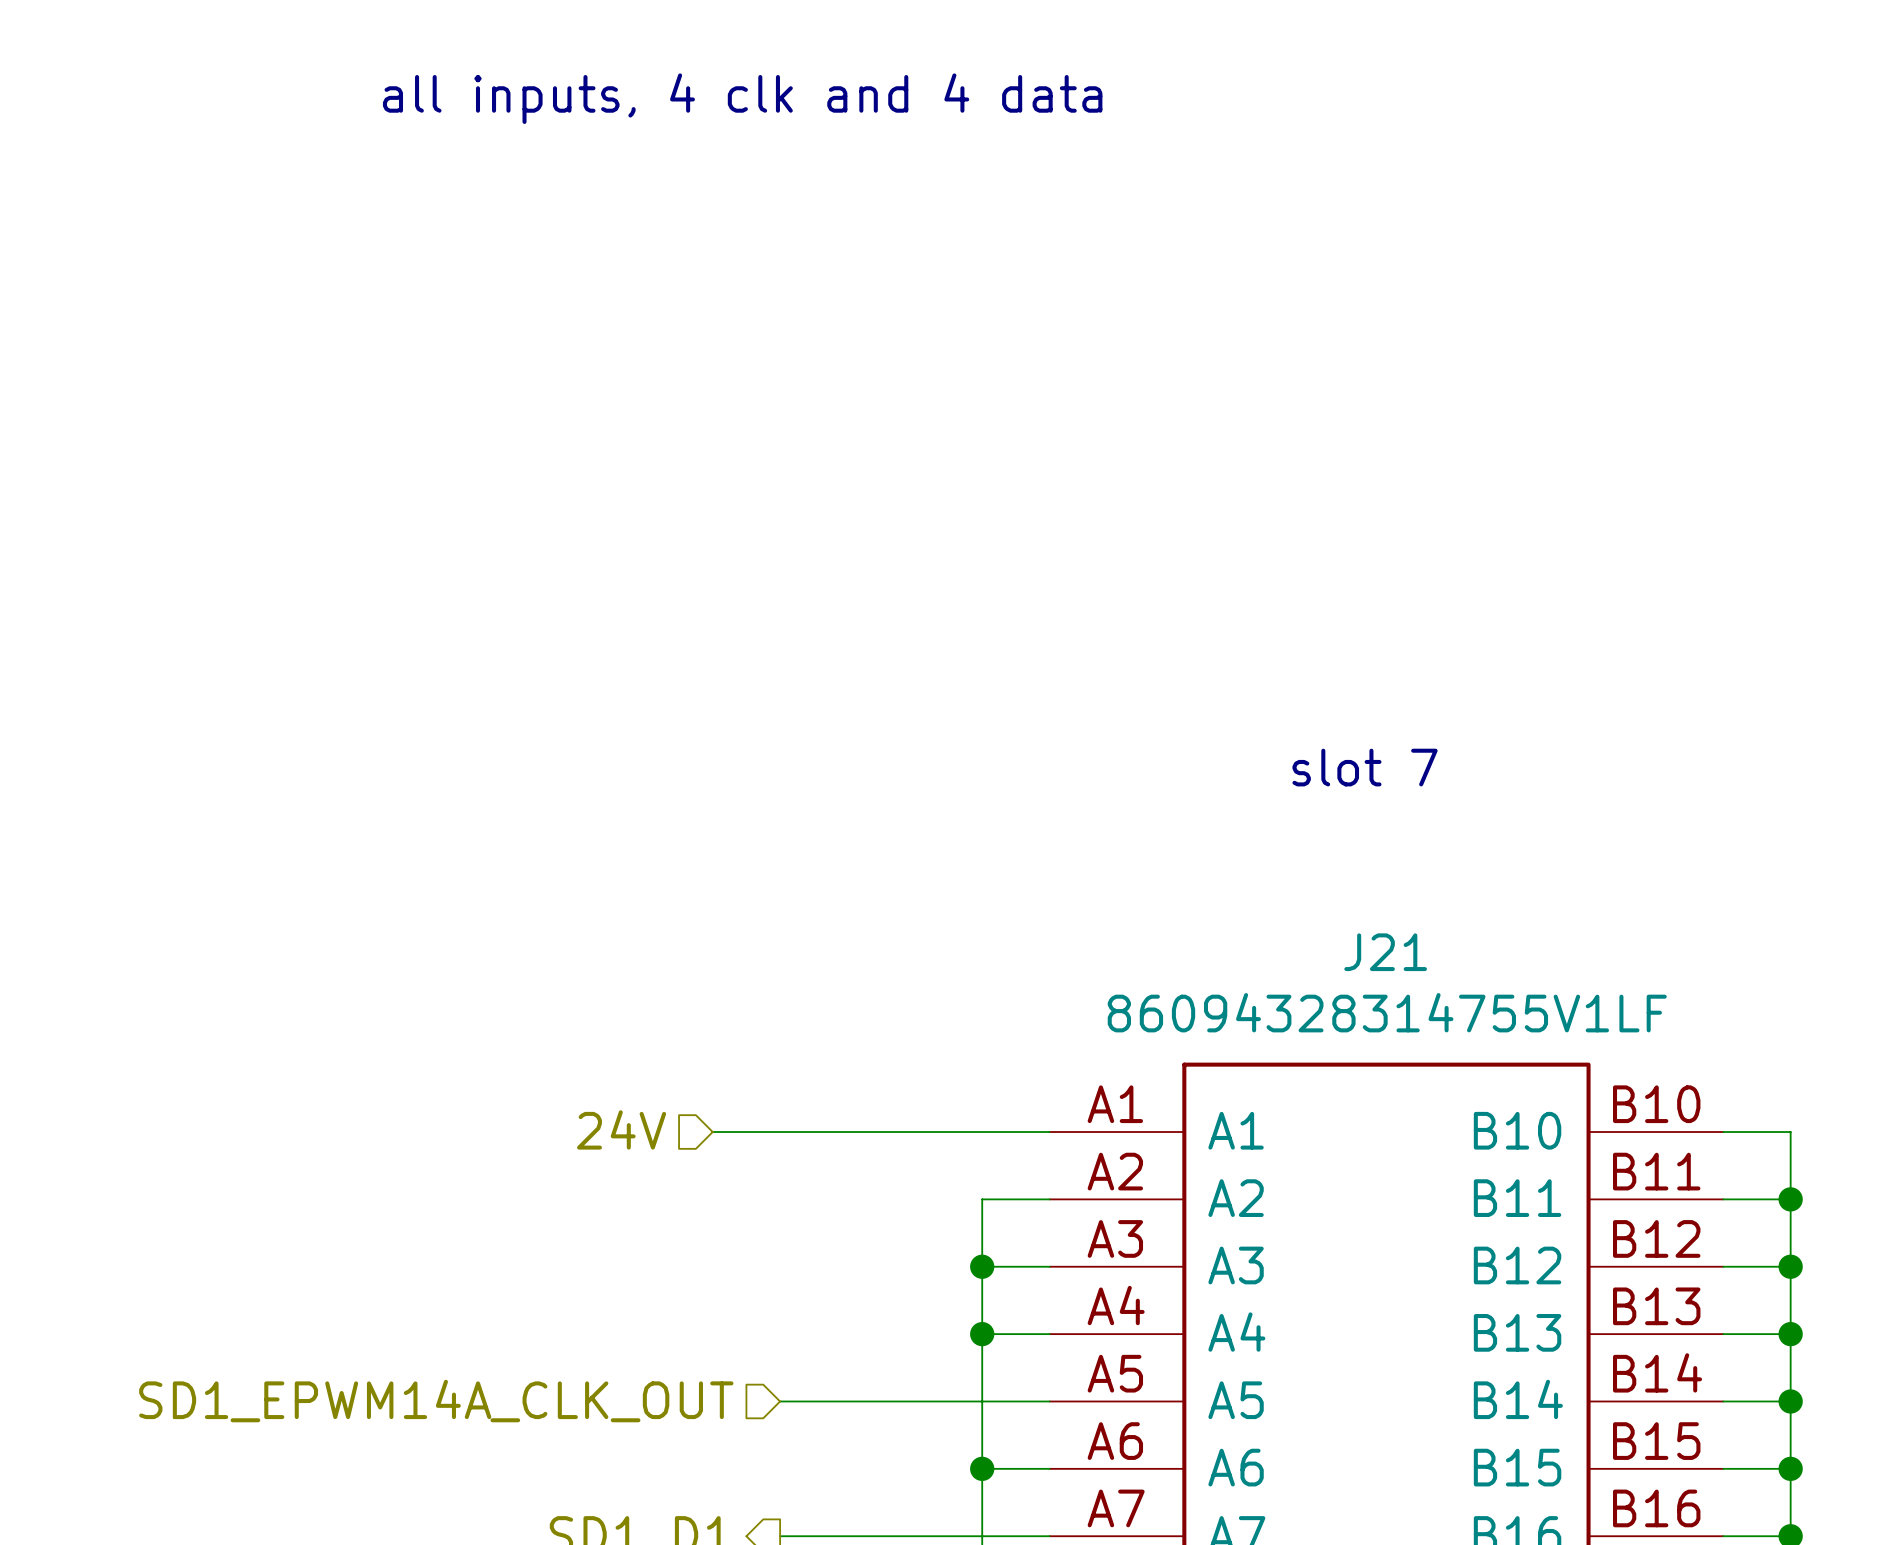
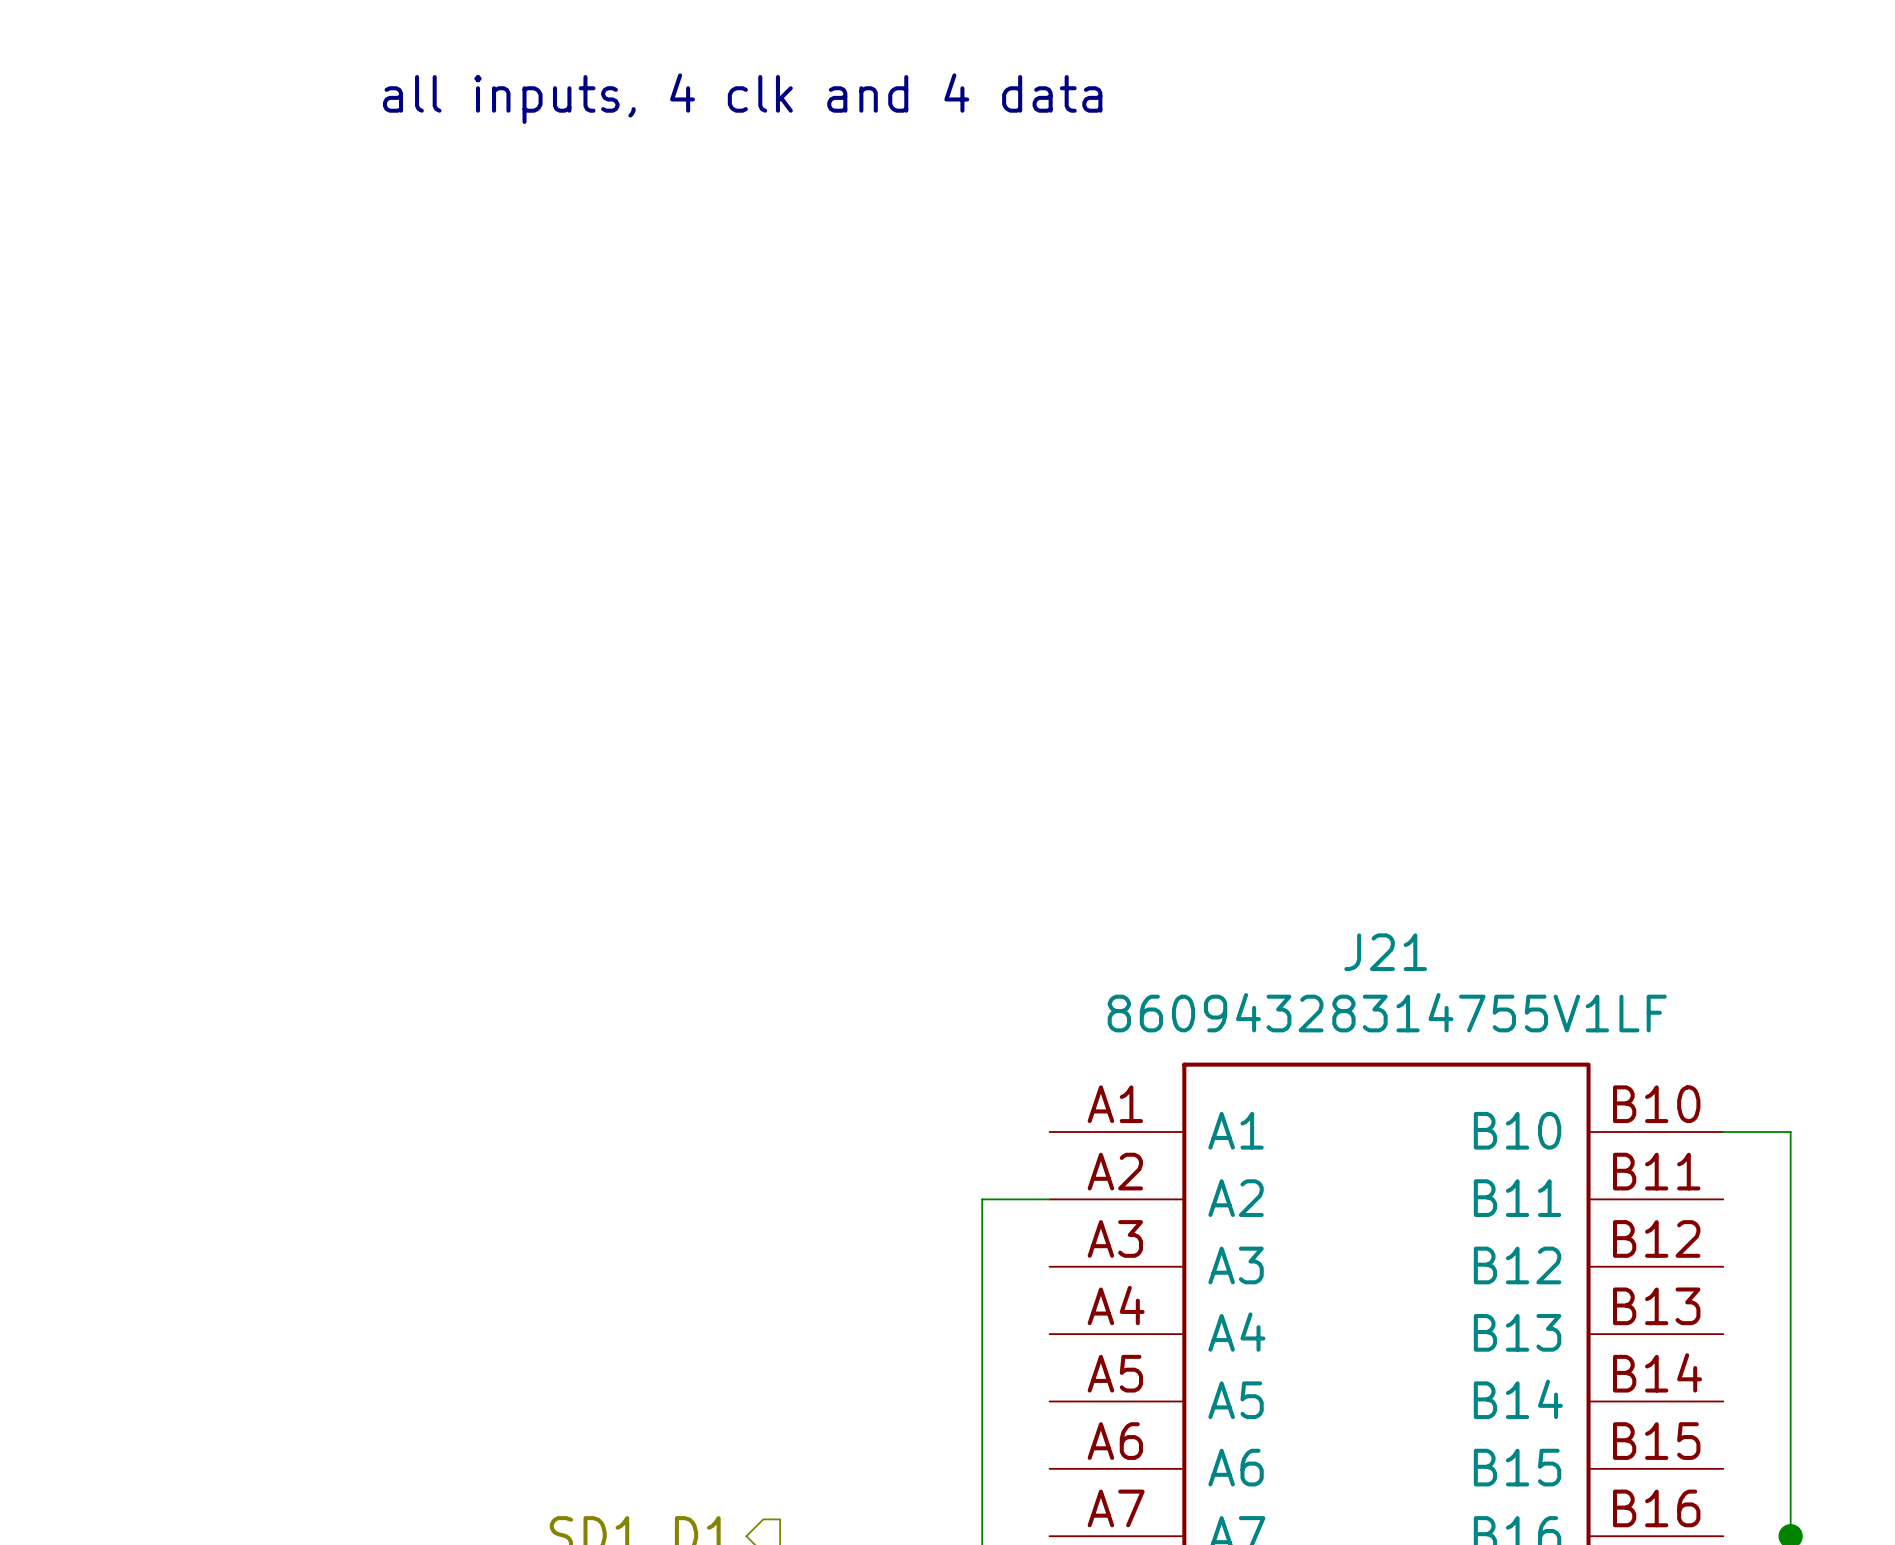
text: slot 7 (1365, 767) -> none
hierarchical label: 24V (621, 1129) -> none
wire: (712, 1132) (1049, 1132) -> none
wire: (1723, 1199) (1790, 1199) -> none
junction: (1790, 1199) -> none
wire: (982, 1266) (1049, 1266) -> none
junction: (982, 1266) -> none
wire: (1723, 1266) (1790, 1266) -> none
junction: (1790, 1266) -> none
wire: (982, 1334) (1049, 1334) -> none
junction: (982, 1334) -> none
wire: (1723, 1334) (1790, 1334) -> none
junction: (1790, 1334) -> none
hierarchical label: SD1_EPWM14A_CLK_OUT (436, 1401) -> none
wire: (780, 1401) (1049, 1401) -> none
wire: (1723, 1401) (1790, 1401) -> none
junction: (1790, 1401) -> none
wire: (982, 1468) (1049, 1468) -> none
junction: (982, 1468) -> none
wire: (1723, 1468) (1790, 1468) -> none
junction: (1790, 1468) -> none
wire: (780, 1536) (1049, 1536) -> none
wire: (1723, 1536) (1790, 1536) -> none

